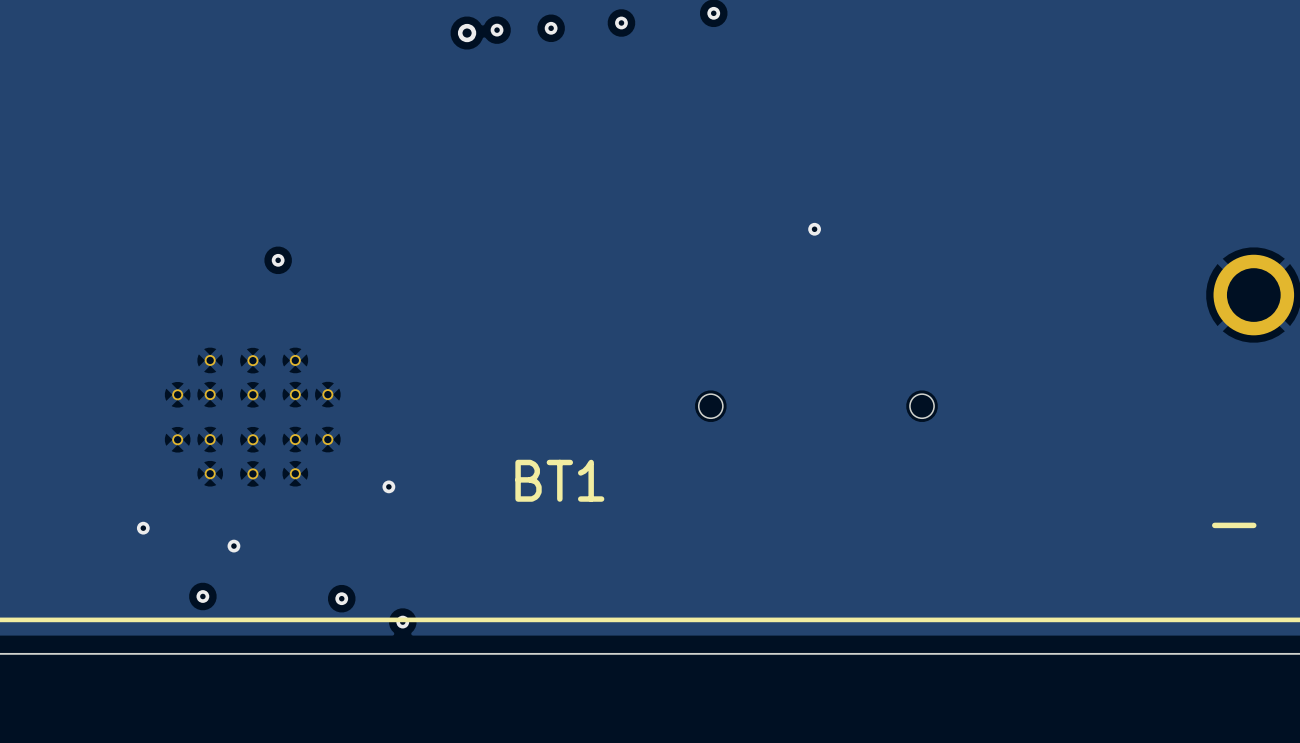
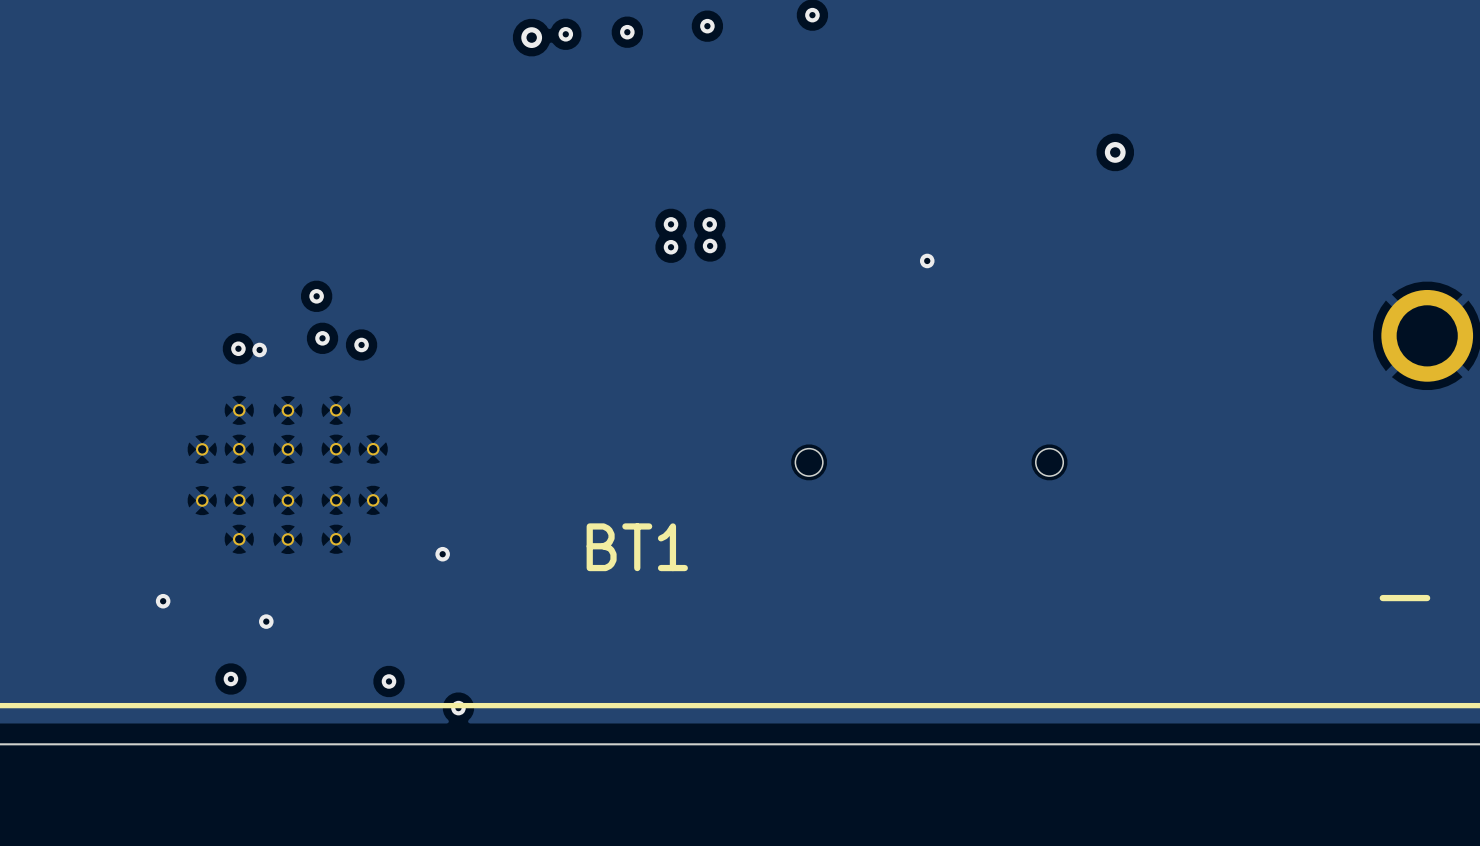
via: none -> (1115, 152)
via: none -> (671, 224)
via: none -> (709, 224)
via: none -> (710, 245)
via: none -> (671, 247)
via: none -> (322, 338)
via: none -> (361, 344)
via: none -> (238, 348)
via: none -> (259, 349)

